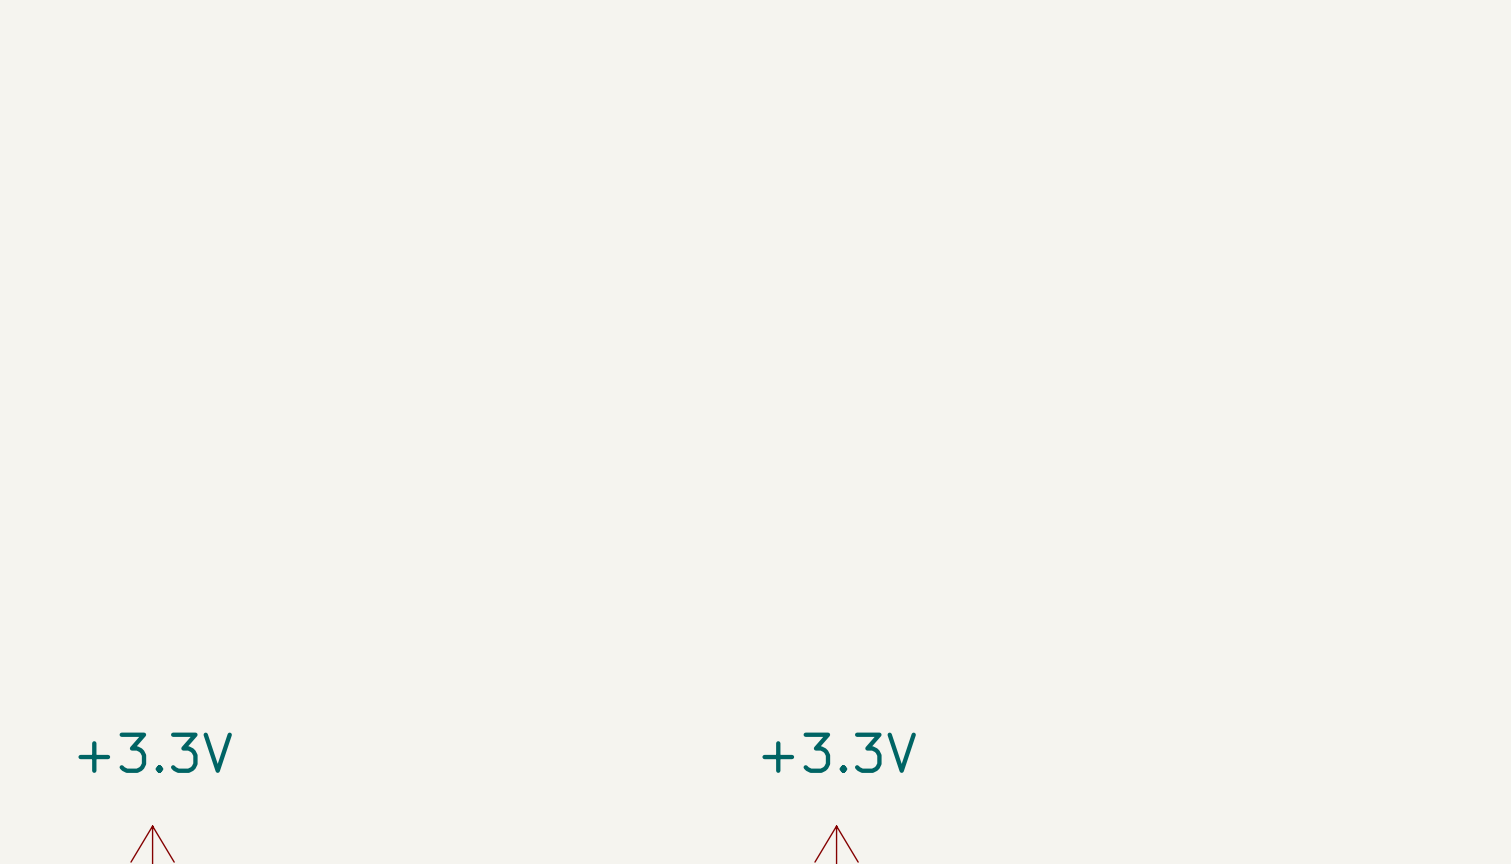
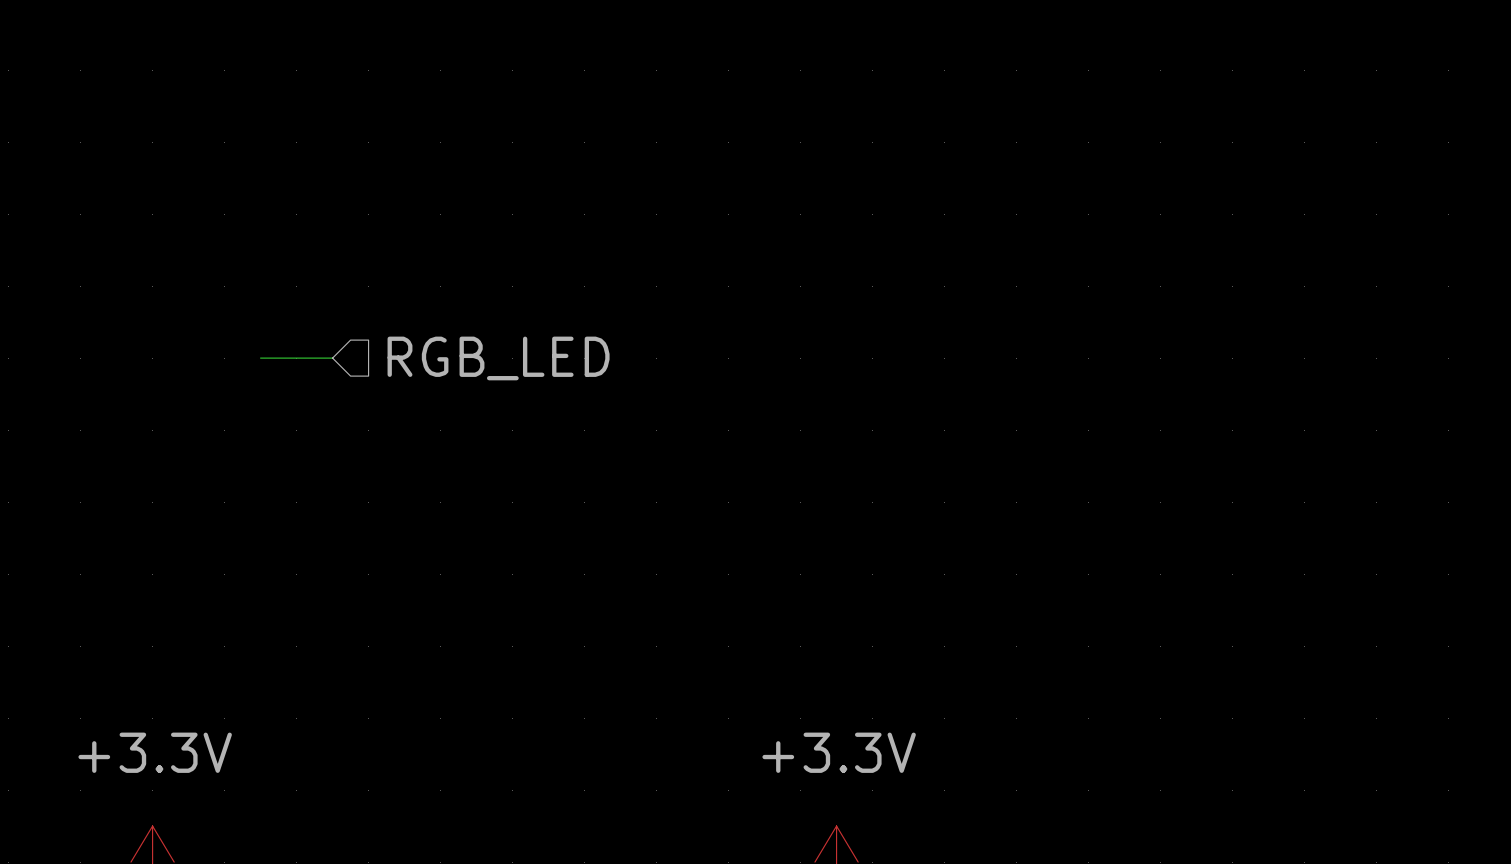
wire: none -> (260, 358) (332, 358)
hierarchical label: none -> RGB_LED (498, 358)

